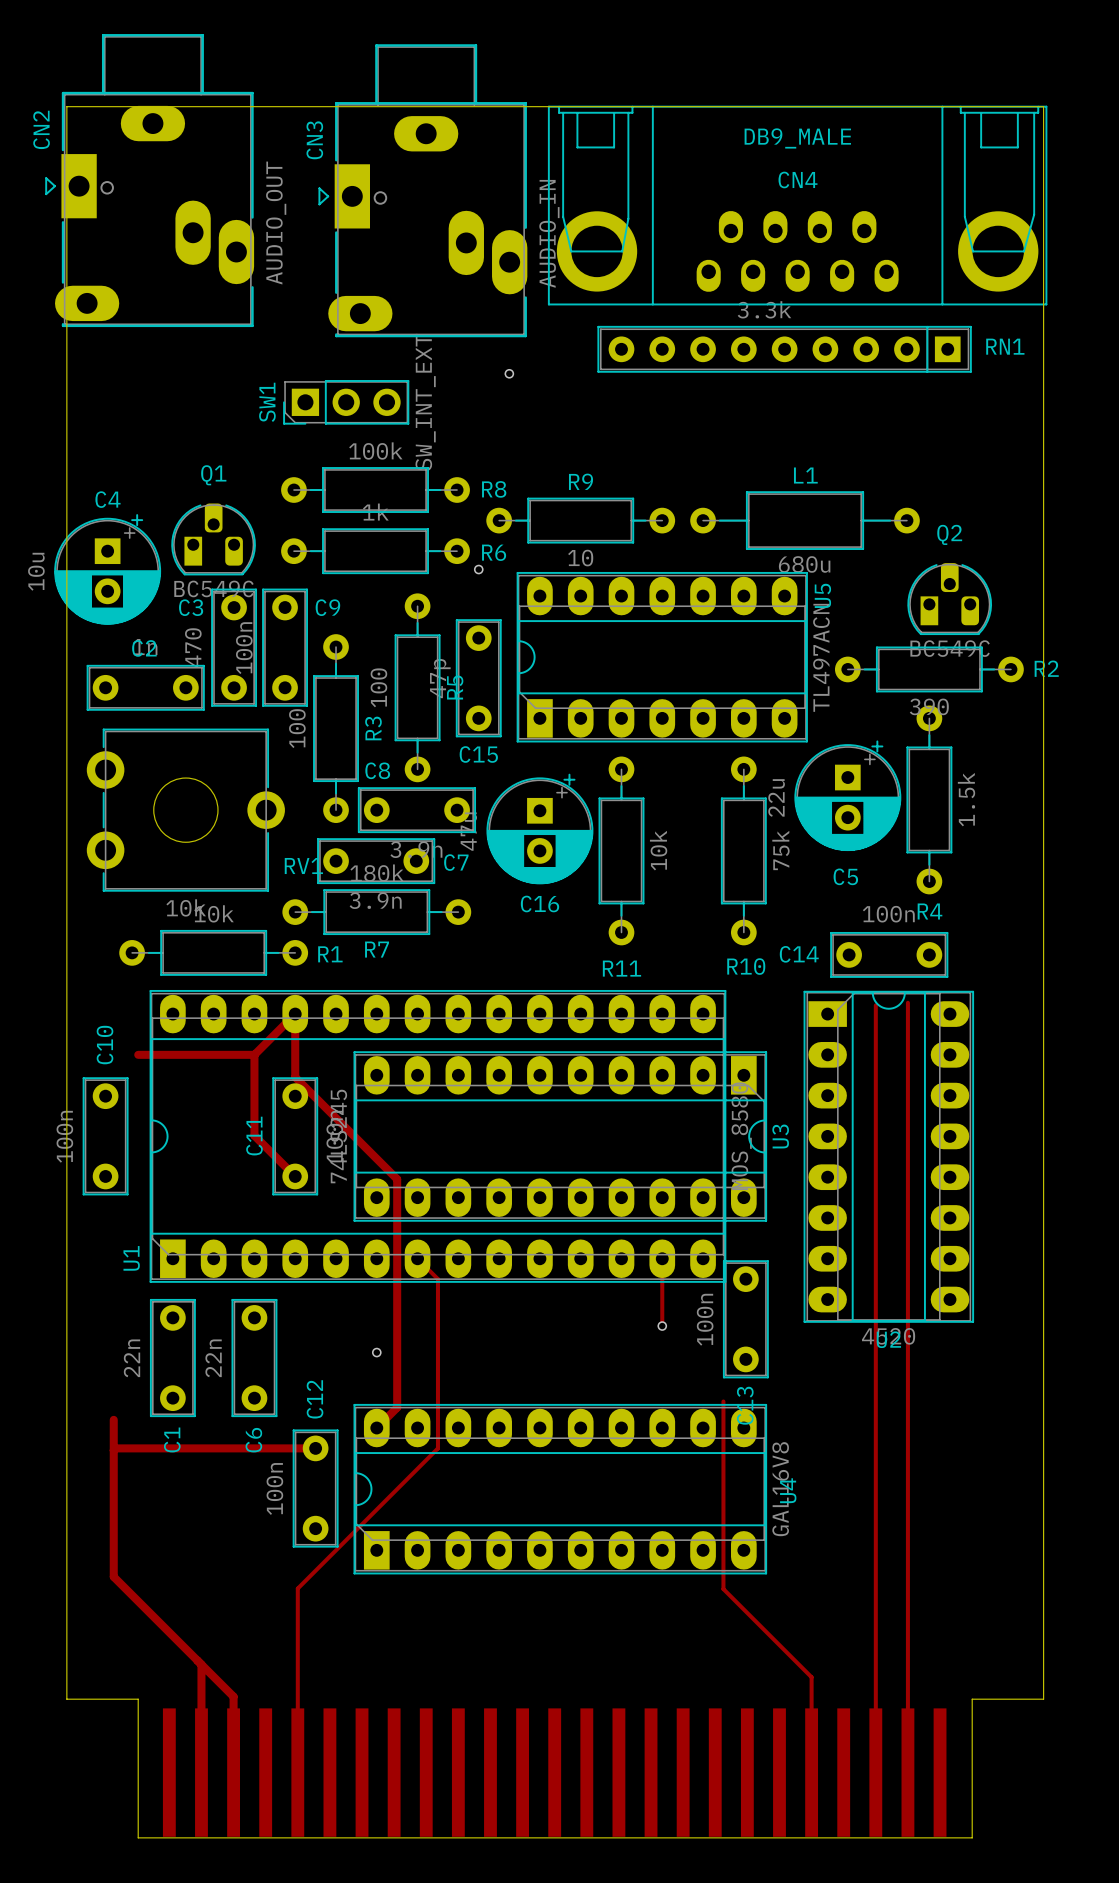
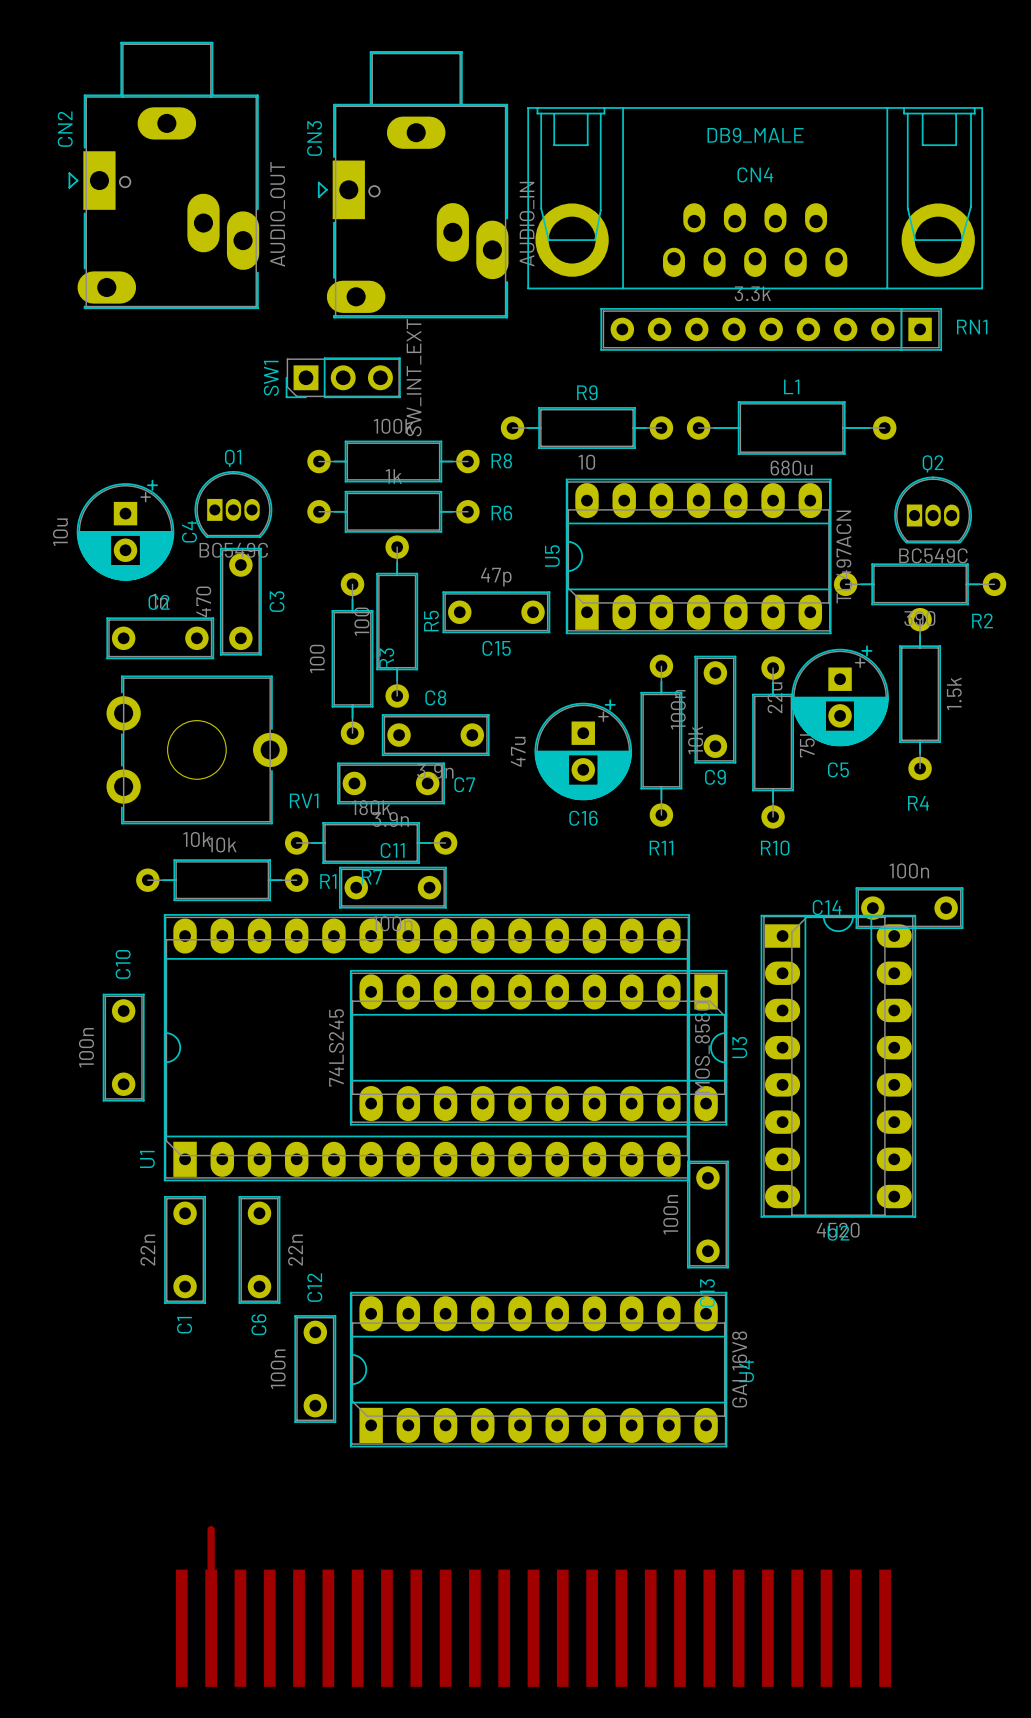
board edge: (66, 106) (66, 1699) (138, 1699) (138, 1837) (972, 1837) (972, 1699) (1043, 1699) (1043, 106) (66, 106) -> none
RN1 position: (784, 349) -> (771, 329)
via: (509, 373) -> none
R8 position: (375, 490) -> (393, 461)
C4 name rotation: 0° (108, 499) -> 90° counterclockwise (189, 531)
C4 name position: C4 (108, 499) -> C4 (189, 531)
Q1 footprint: [171, 503, 256, 576] -> [194, 470, 273, 538]
R9 position: (580, 520) -> (586, 428)
L1 position: (805, 520) -> (791, 428)
R6 position: (375, 551) -> (393, 511)
Q2 footprint: [907, 563, 993, 636] -> [894, 476, 973, 544]
via: (478, 569) -> none
U5 name position: U5 (822, 595) -> U5 (552, 556)
C3 name rotation: 0° (191, 607) -> 90° counterclockwise (276, 601)
C3 name position: C3 (191, 607) -> C3 (276, 601)
C9 name position: C9 (327, 607) -> C9 (715, 777)
C9 position: (285, 647) -> (715, 709)
U5 position: (662, 657) -> (698, 556)
R2 position: (929, 669) -> (920, 584)
C15 rotation: 0° (478, 678) -> 90° clockwise (496, 612)
R5 position: (417, 687) -> (397, 621)
R3 position: (336, 728) -> (352, 658)
C15 name position: C15 (478, 754) -> C15 (496, 648)
C8 name position: C8 (377, 770) -> C8 (435, 697)
C5 position: (847, 795) -> (840, 695)
R4 position: (929, 799) -> (920, 694)
C8 position: (416, 810) -> (435, 735)
C16 position: (539, 829) -> (583, 749)
R11 position: (621, 850) -> (661, 740)
R10 position: (743, 850) -> (773, 742)
C7 position: (376, 861) -> (391, 783)
R4 name position: R4 (930, 911) -> R4 (918, 803)
C14 position: (889, 954) -> (909, 908)
track: (907, 1002) (907, 1772) -> none
track: (875, 1005) (875, 1772) -> none
track: (138, 1054) (254, 1054) -> none
track: (254, 1054) (295, 1014) (295, 1077) (397, 1179) (397, 1407) (376, 1428) -> none
track: (254, 1054) (254, 1135) (295, 1176) -> none
C11 rotation: 0° (295, 1136) -> 90° clockwise (392, 887)
C11 position: (295, 1136) -> (392, 887)
track: (417, 1258) (437, 1279) (437, 1448) (297, 1588) (297, 1772) -> none
track: (662, 1258) (662, 1326) -> none
via: (662, 1326) -> none
via: (376, 1352) -> none
C6 value position: 22n (213, 1358) -> 22n (295, 1250)
track: (723, 1401) (723, 1589) (811, 1677) (811, 1772) -> none
track: (113, 1419) (113, 1576) (233, 1696) (233, 1772) -> none
track: (315, 1448) (115, 1448) (113, 1450) -> none

